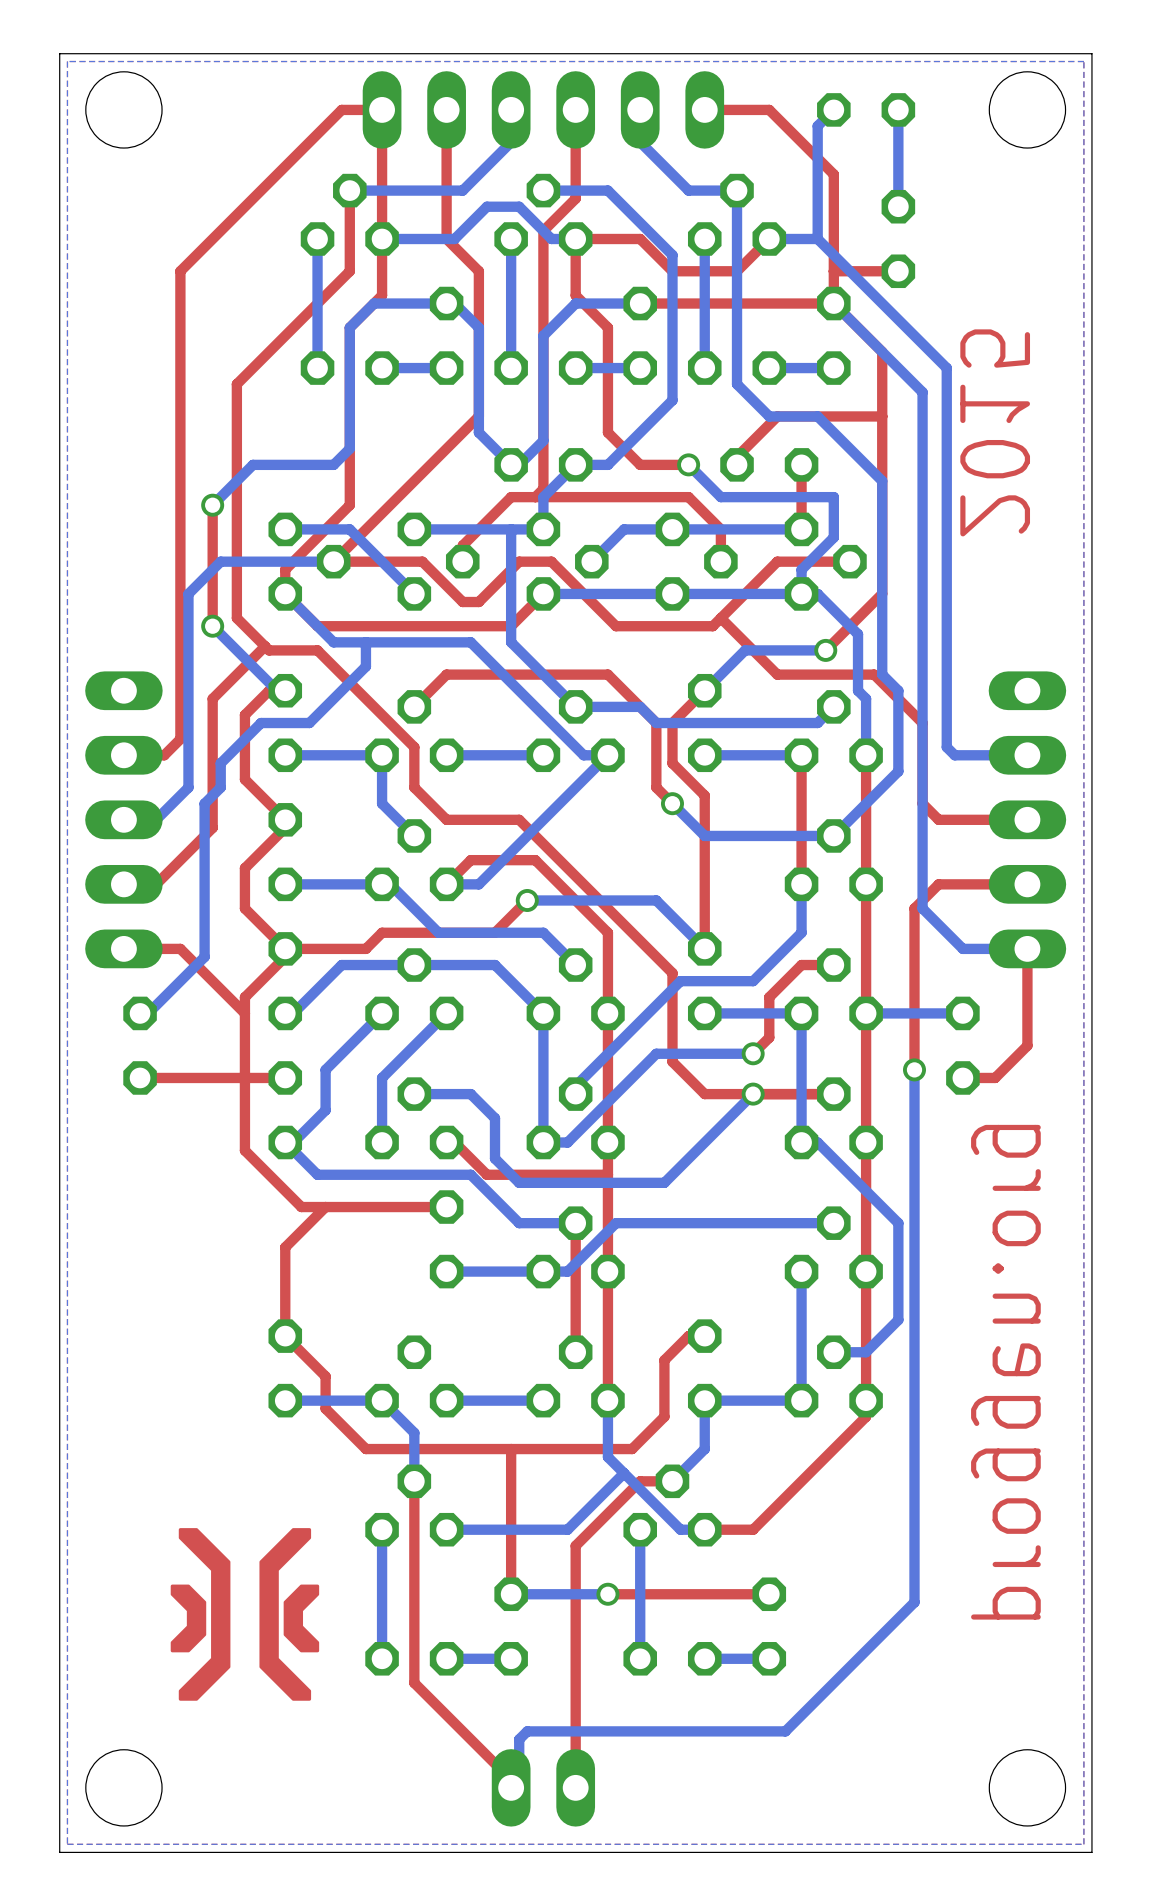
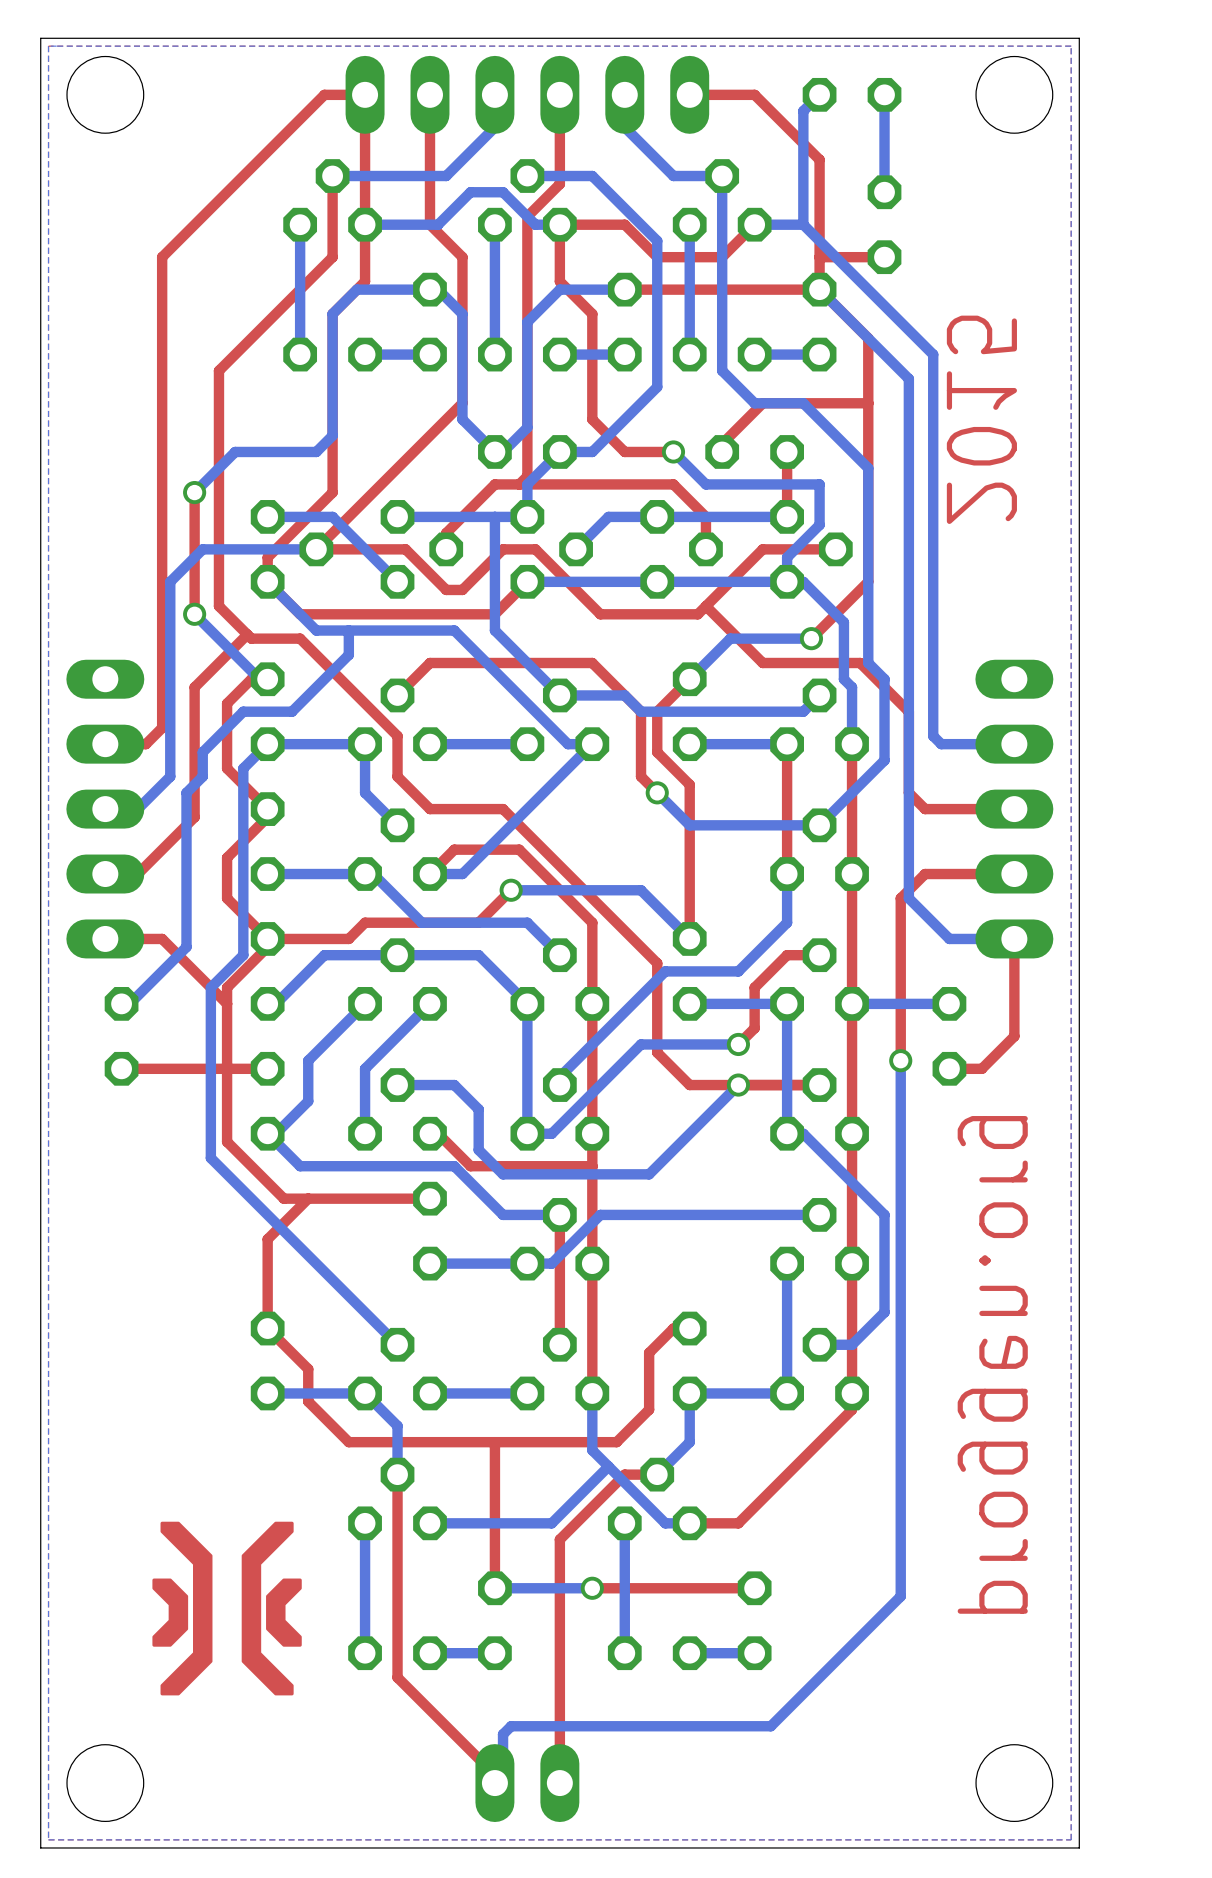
bottom track: none -> (267, 744) (243, 768) (243, 955) (210, 987) (210, 1158) (397, 1344)

